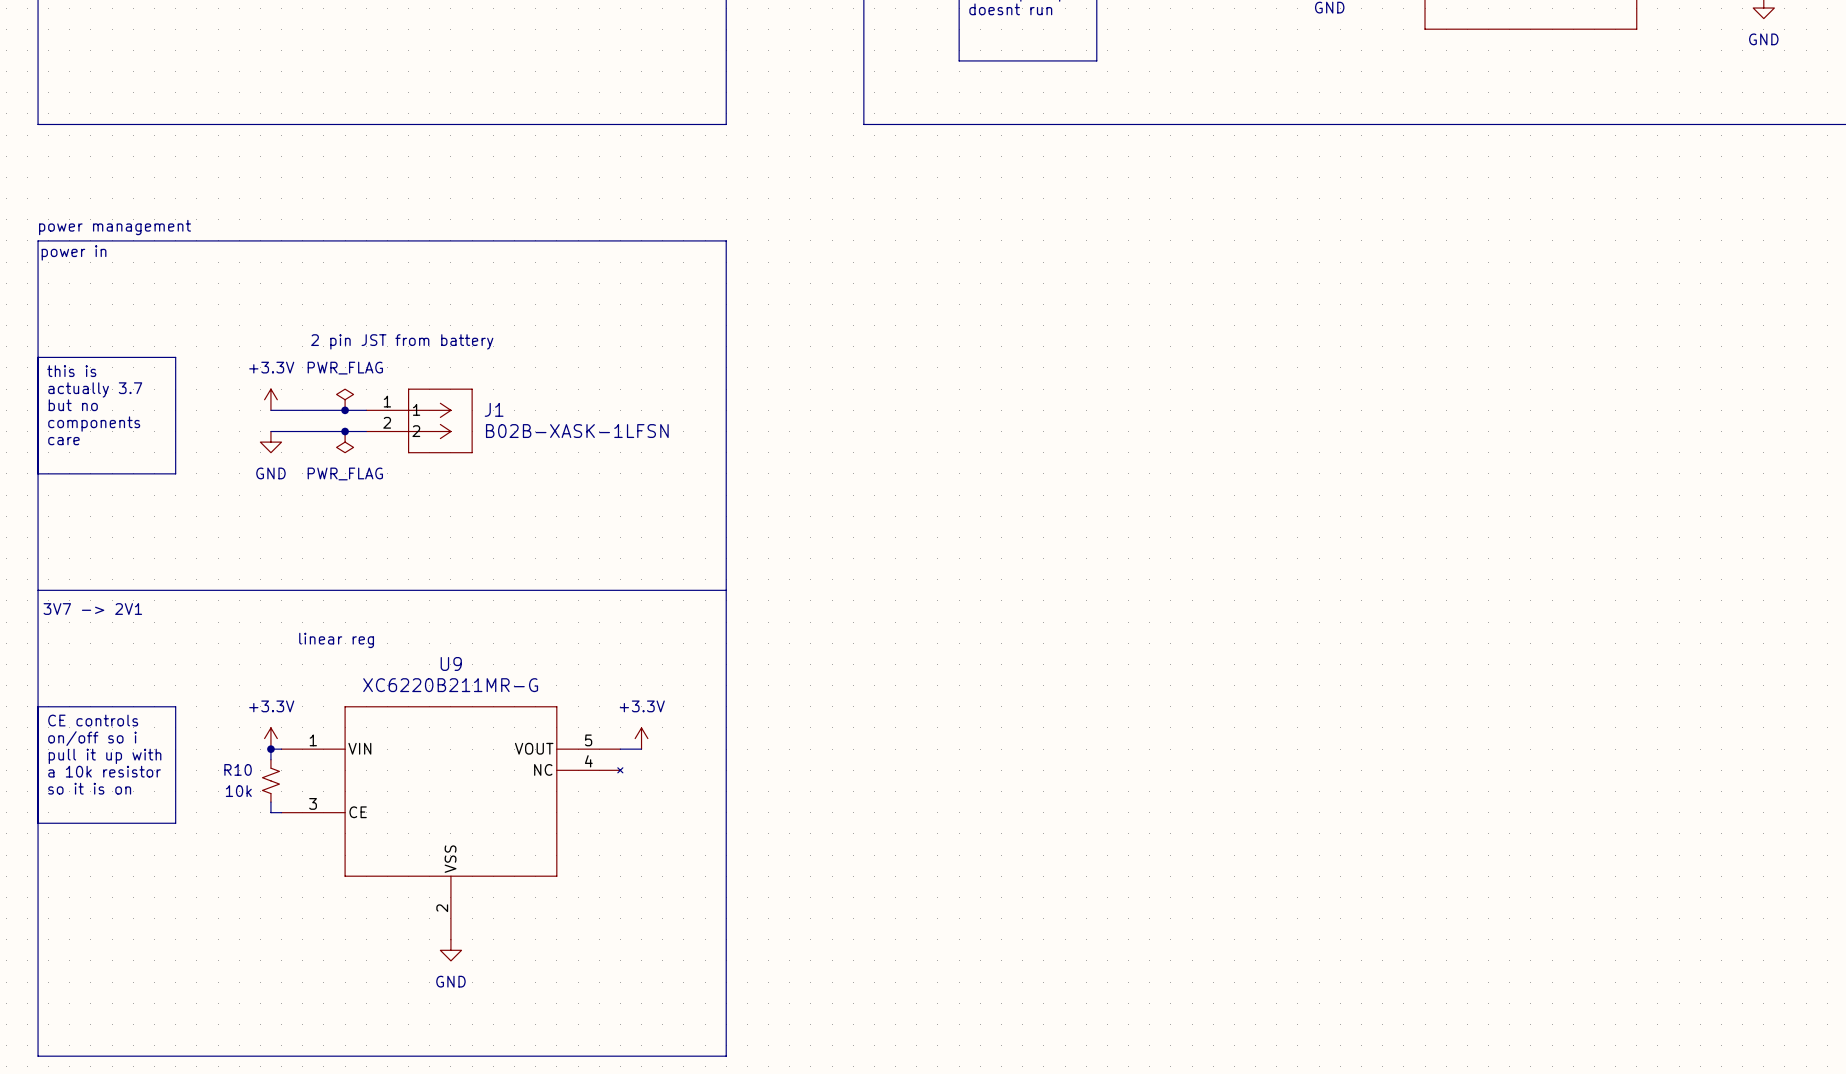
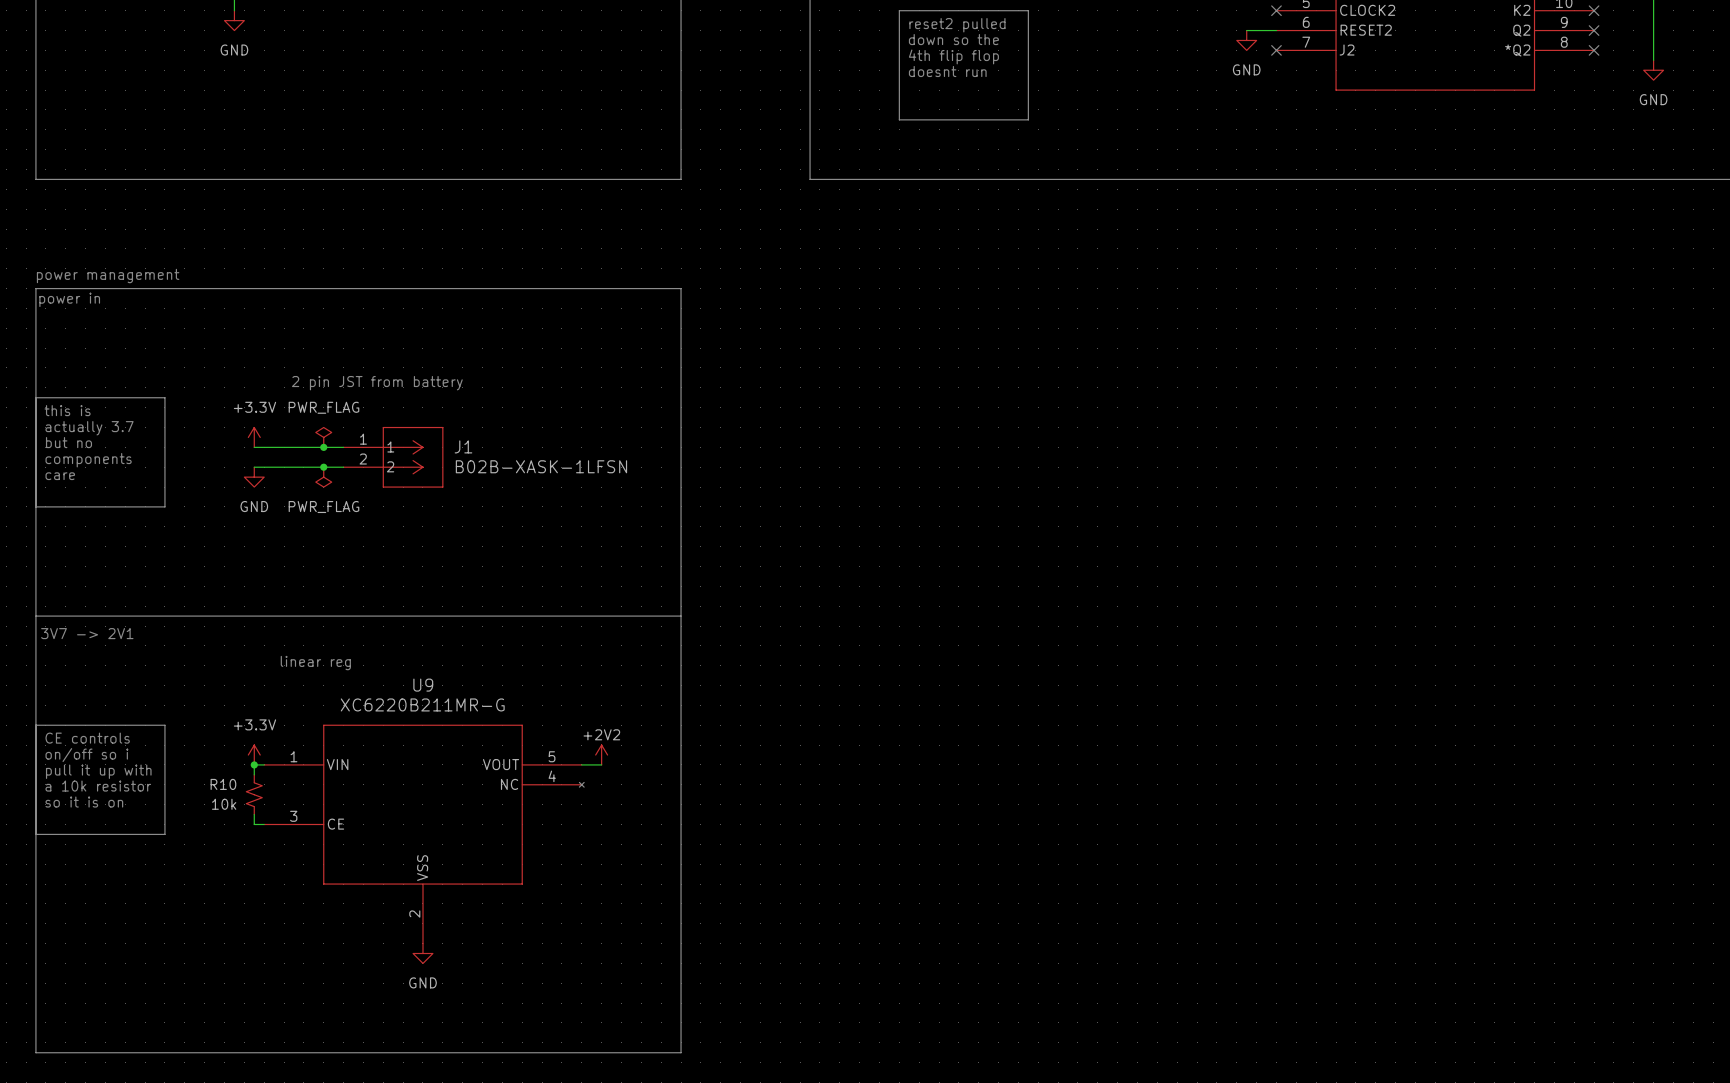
power symbol: +3.3V (641, 738) -> +2V2 (601, 755)

